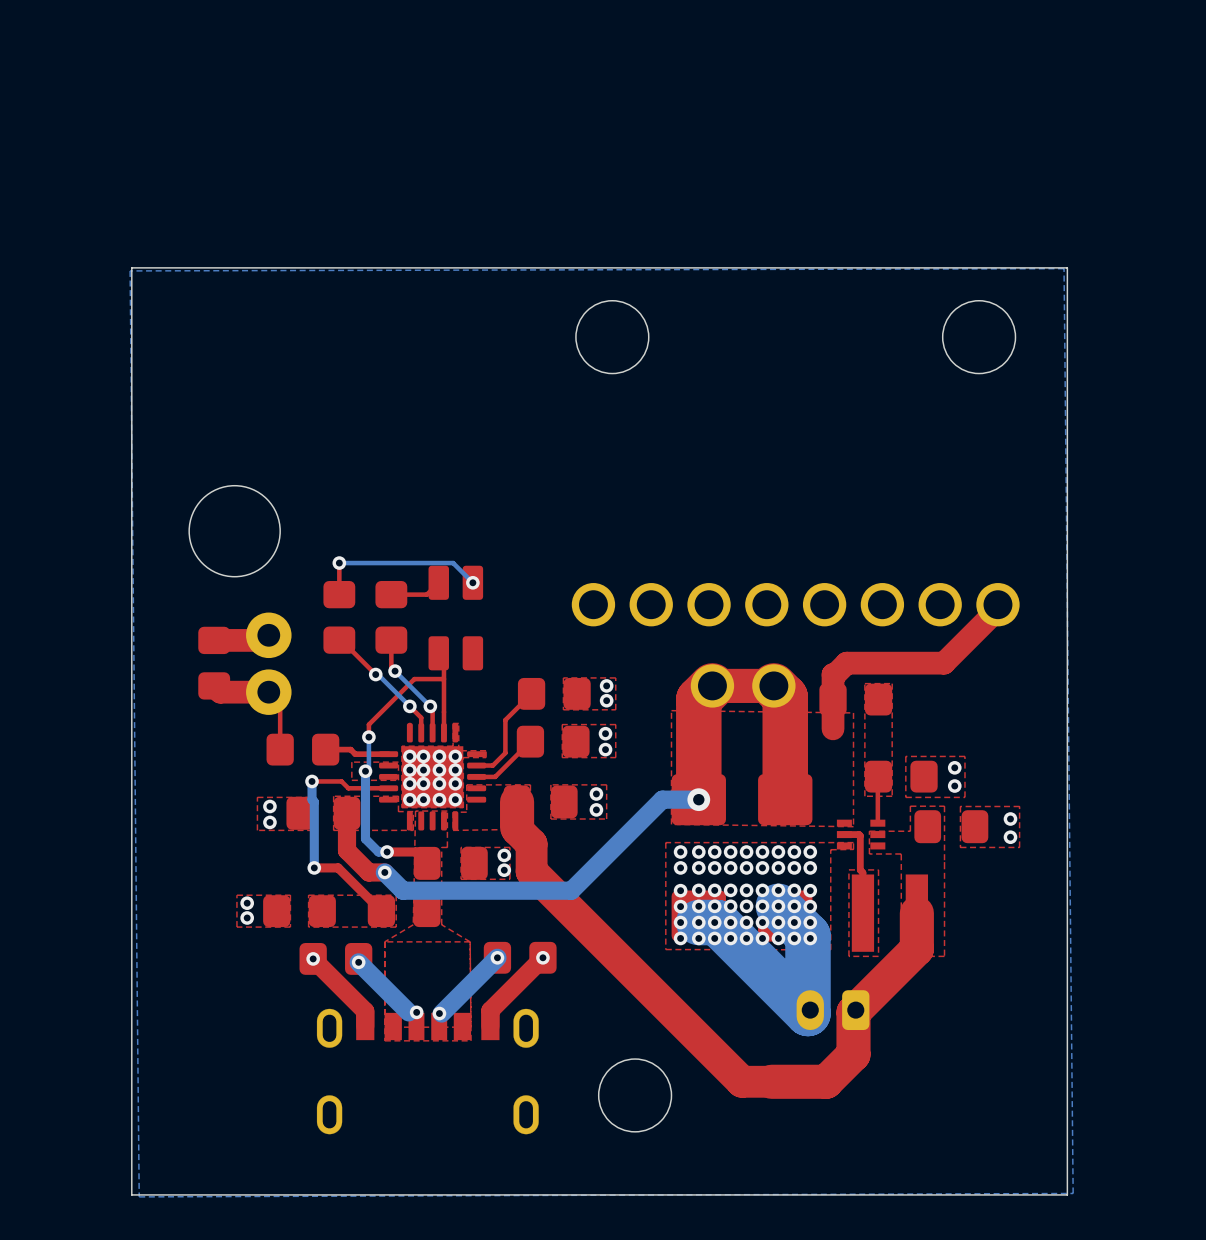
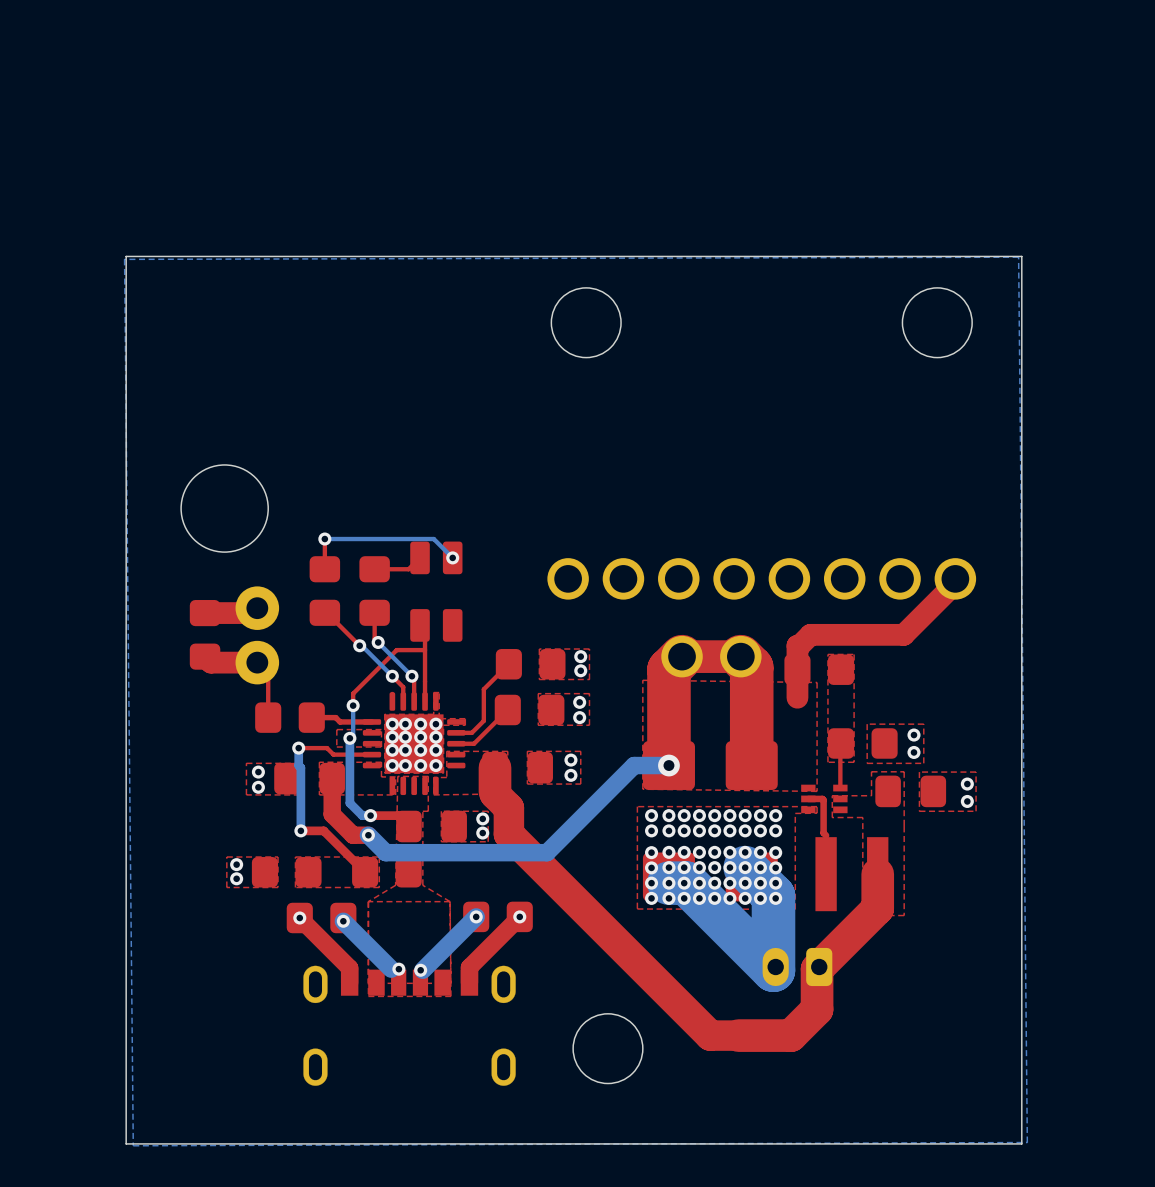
top zone outline: (878, 869) (878, 956) (848, 956) (848, 869) (878, 869) -> none

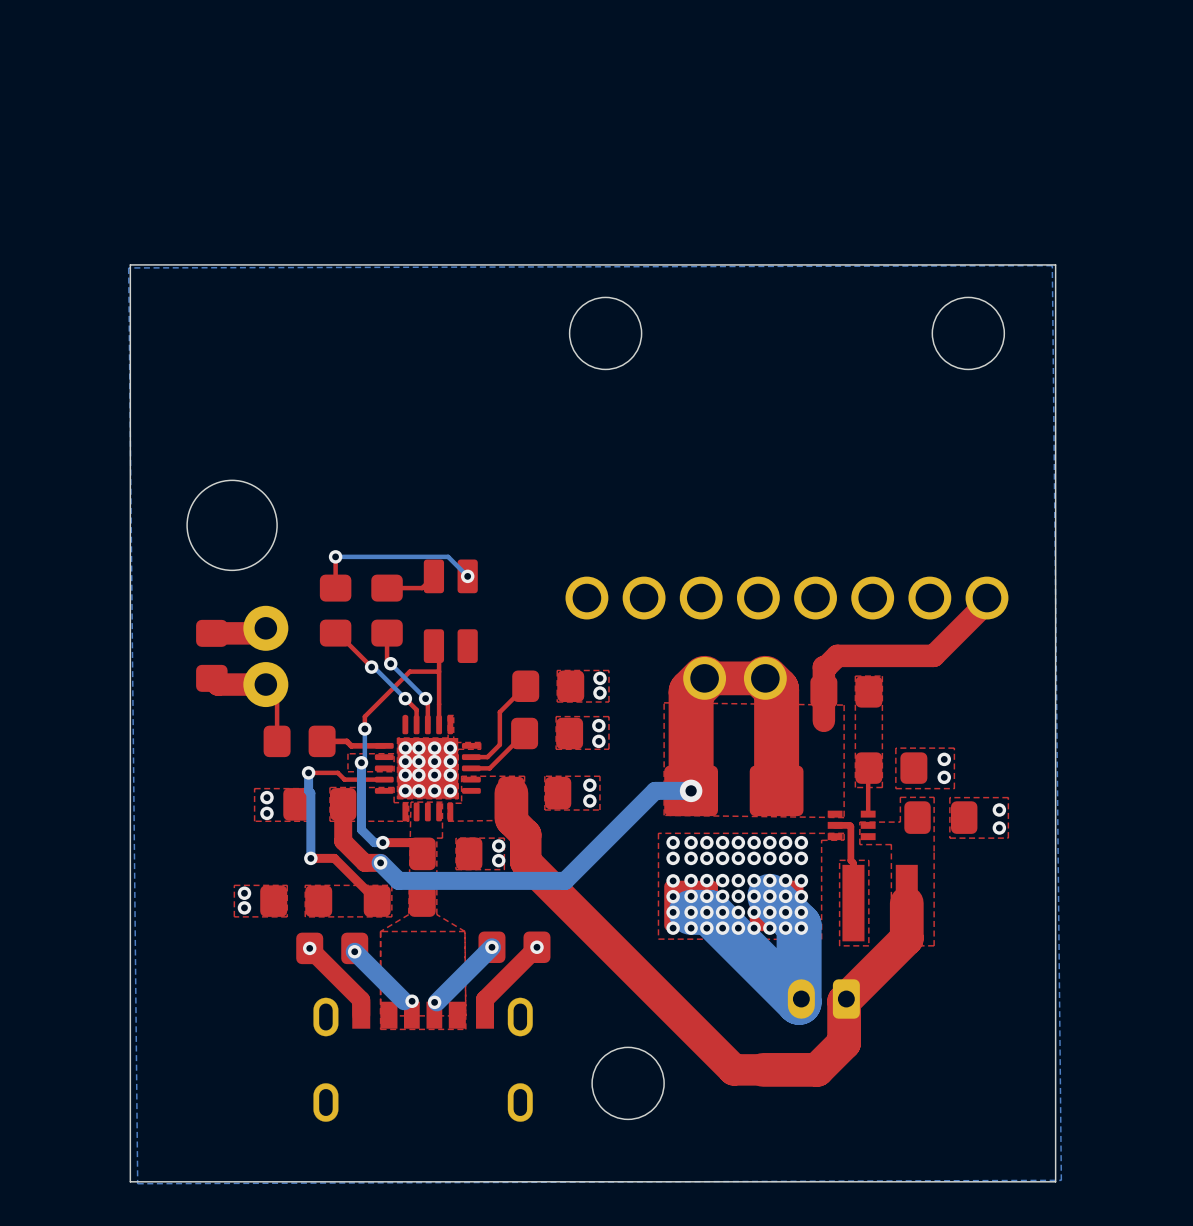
top zone outline: none -> (868, 860) (868, 945) (839, 945) (839, 860) (868, 860)

